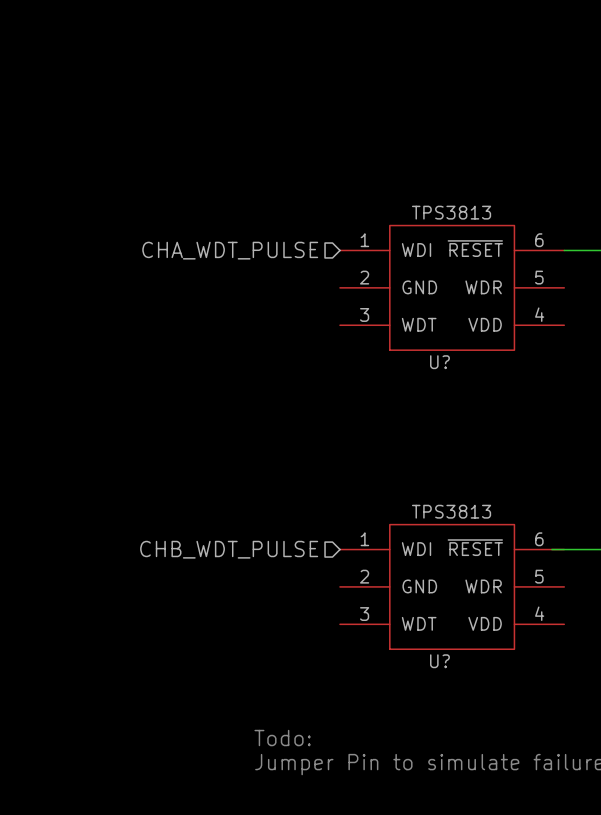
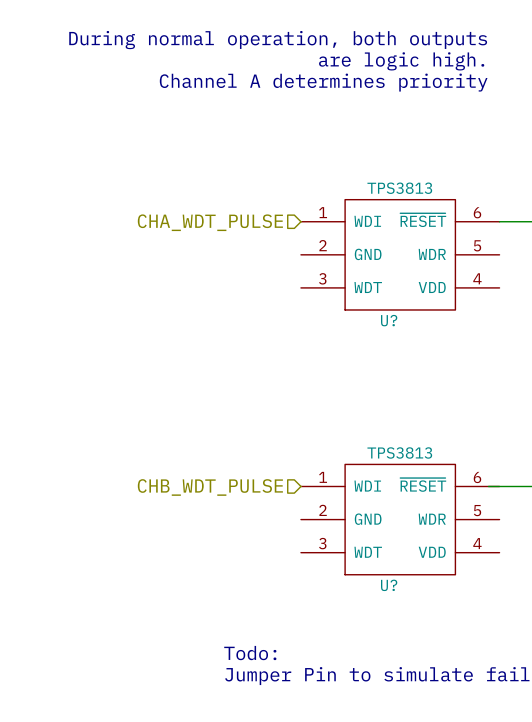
text: none -> During normal operation, both outputs (278, 40)
text: none -> are logic high. (401, 61)
text: none -> Channel A determines priority (323, 82)

